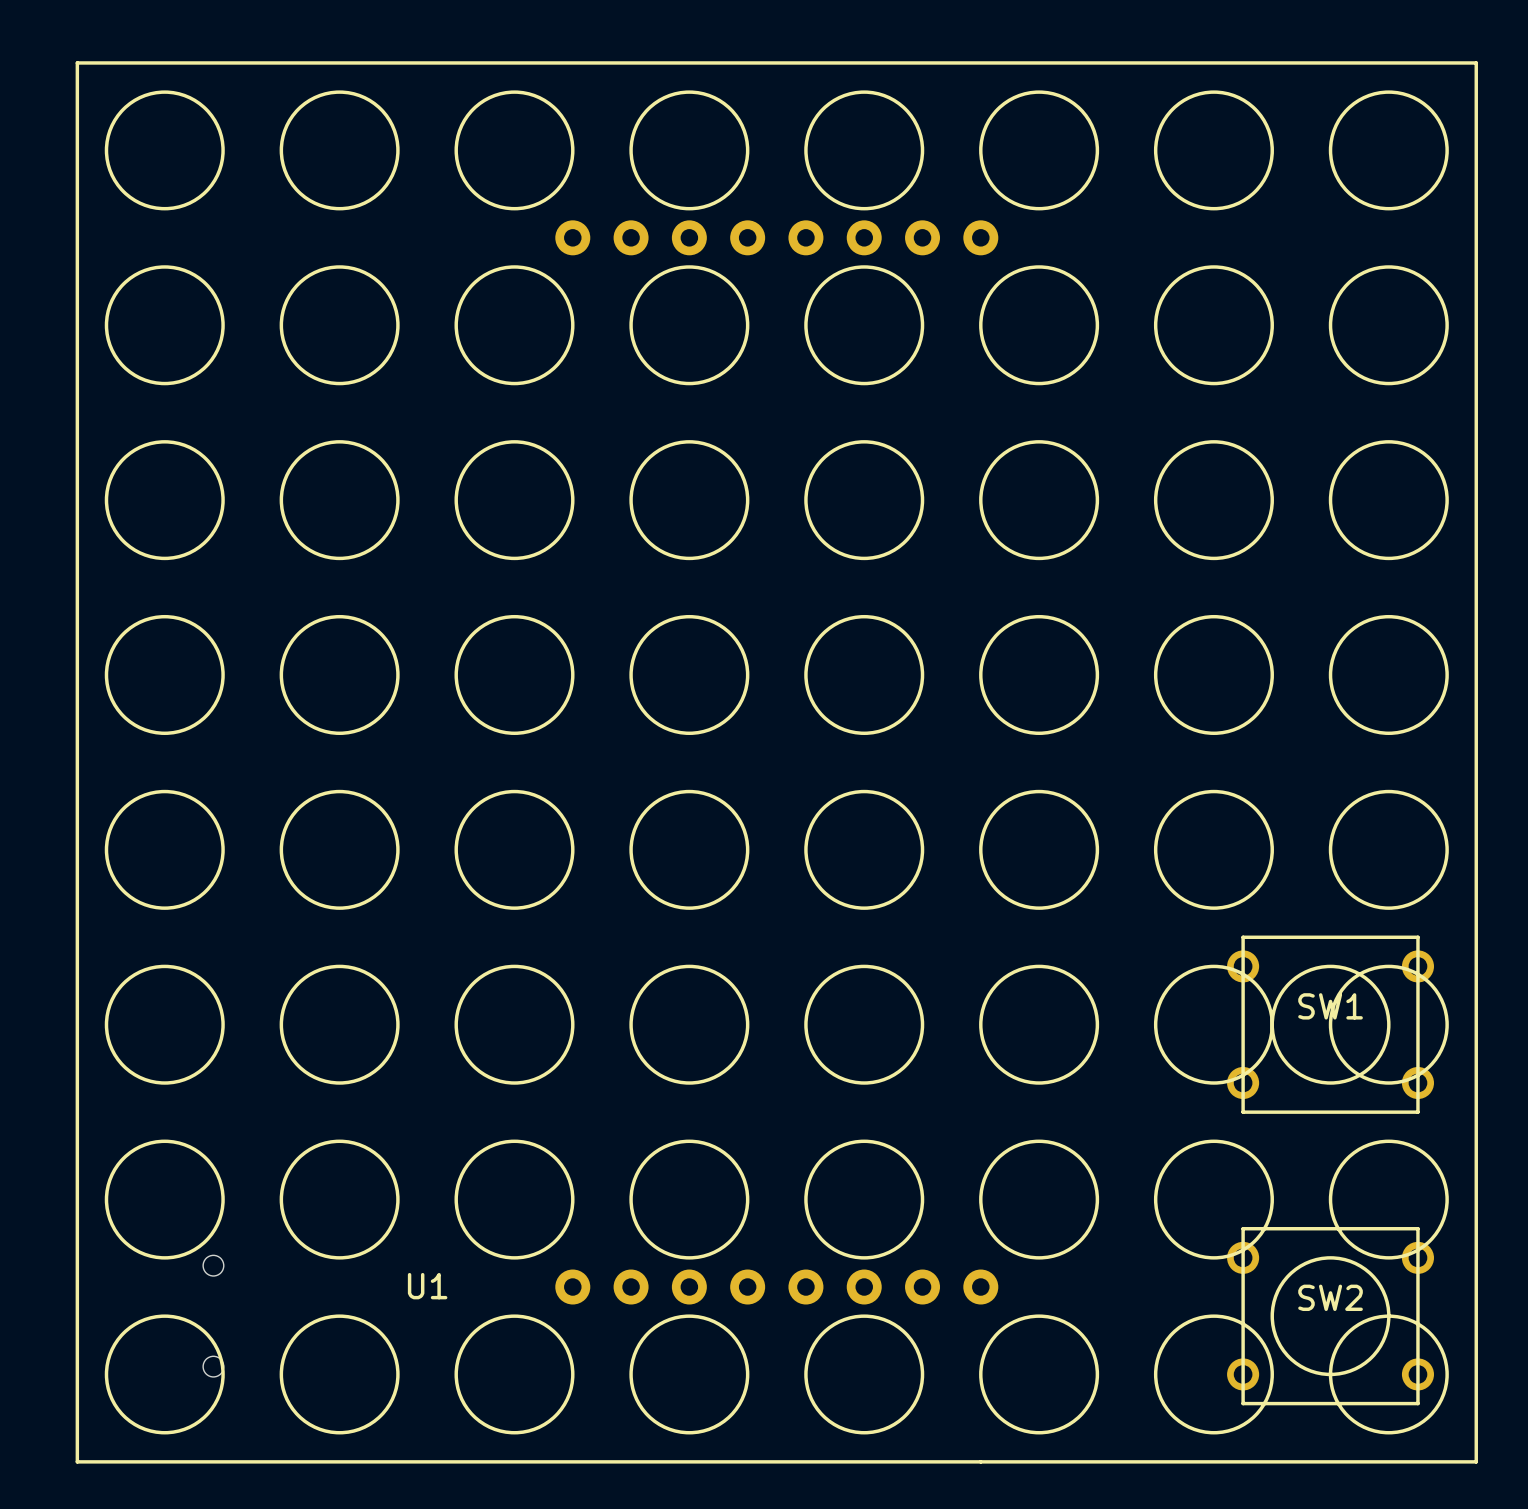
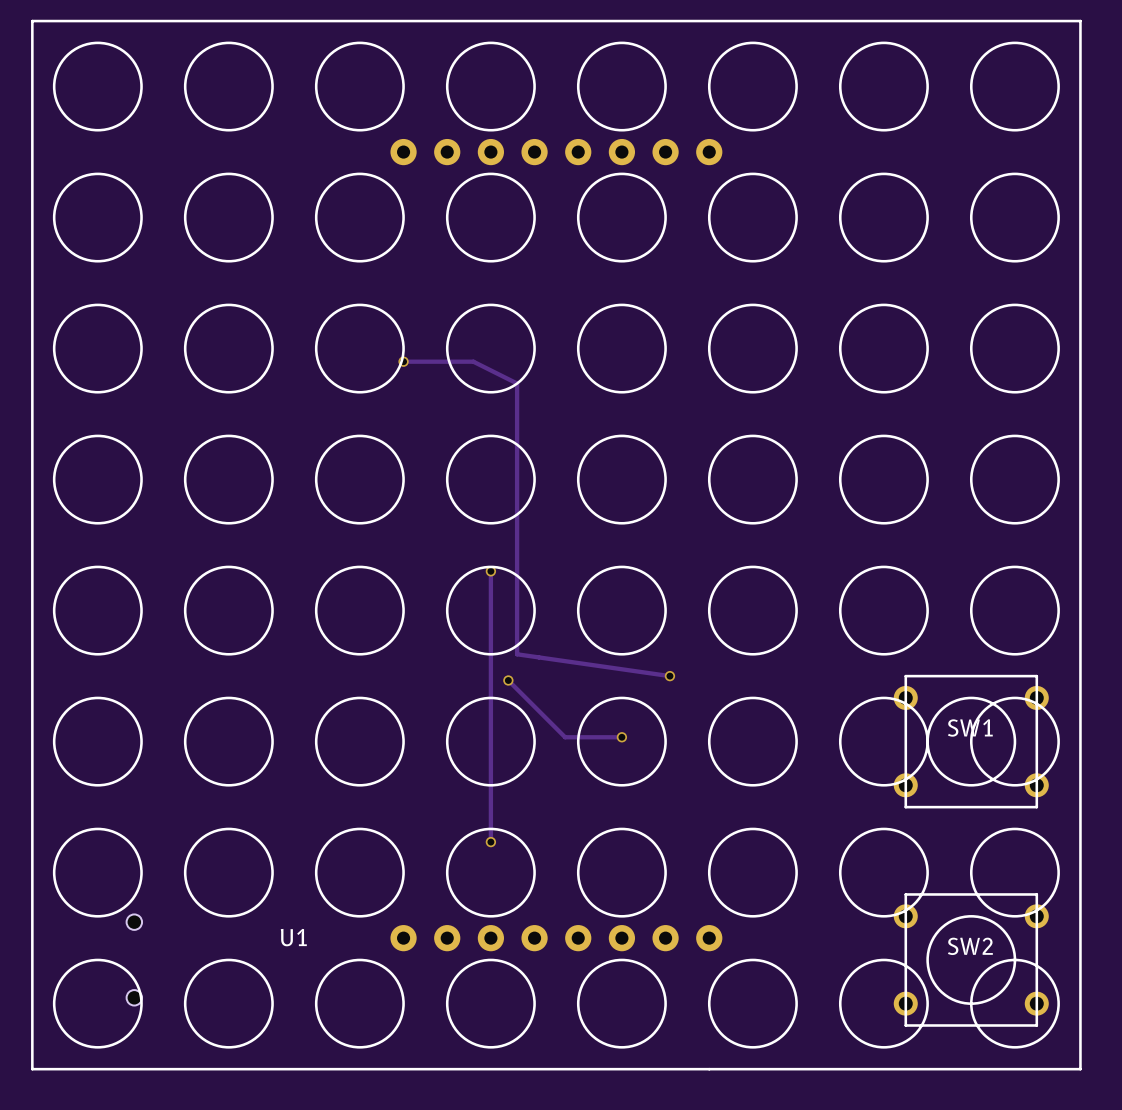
track: none -> (403, 361) (473, 361) (517, 383) (517, 654) (669, 676)
via: none -> (403, 361)
track: none -> (490, 571) (490, 842)
via: none -> (490, 571)
via: none -> (669, 676)
track: none -> (508, 680) (565, 737) (621, 737)
via: none -> (508, 680)
via: none -> (621, 737)
via: none -> (490, 842)

